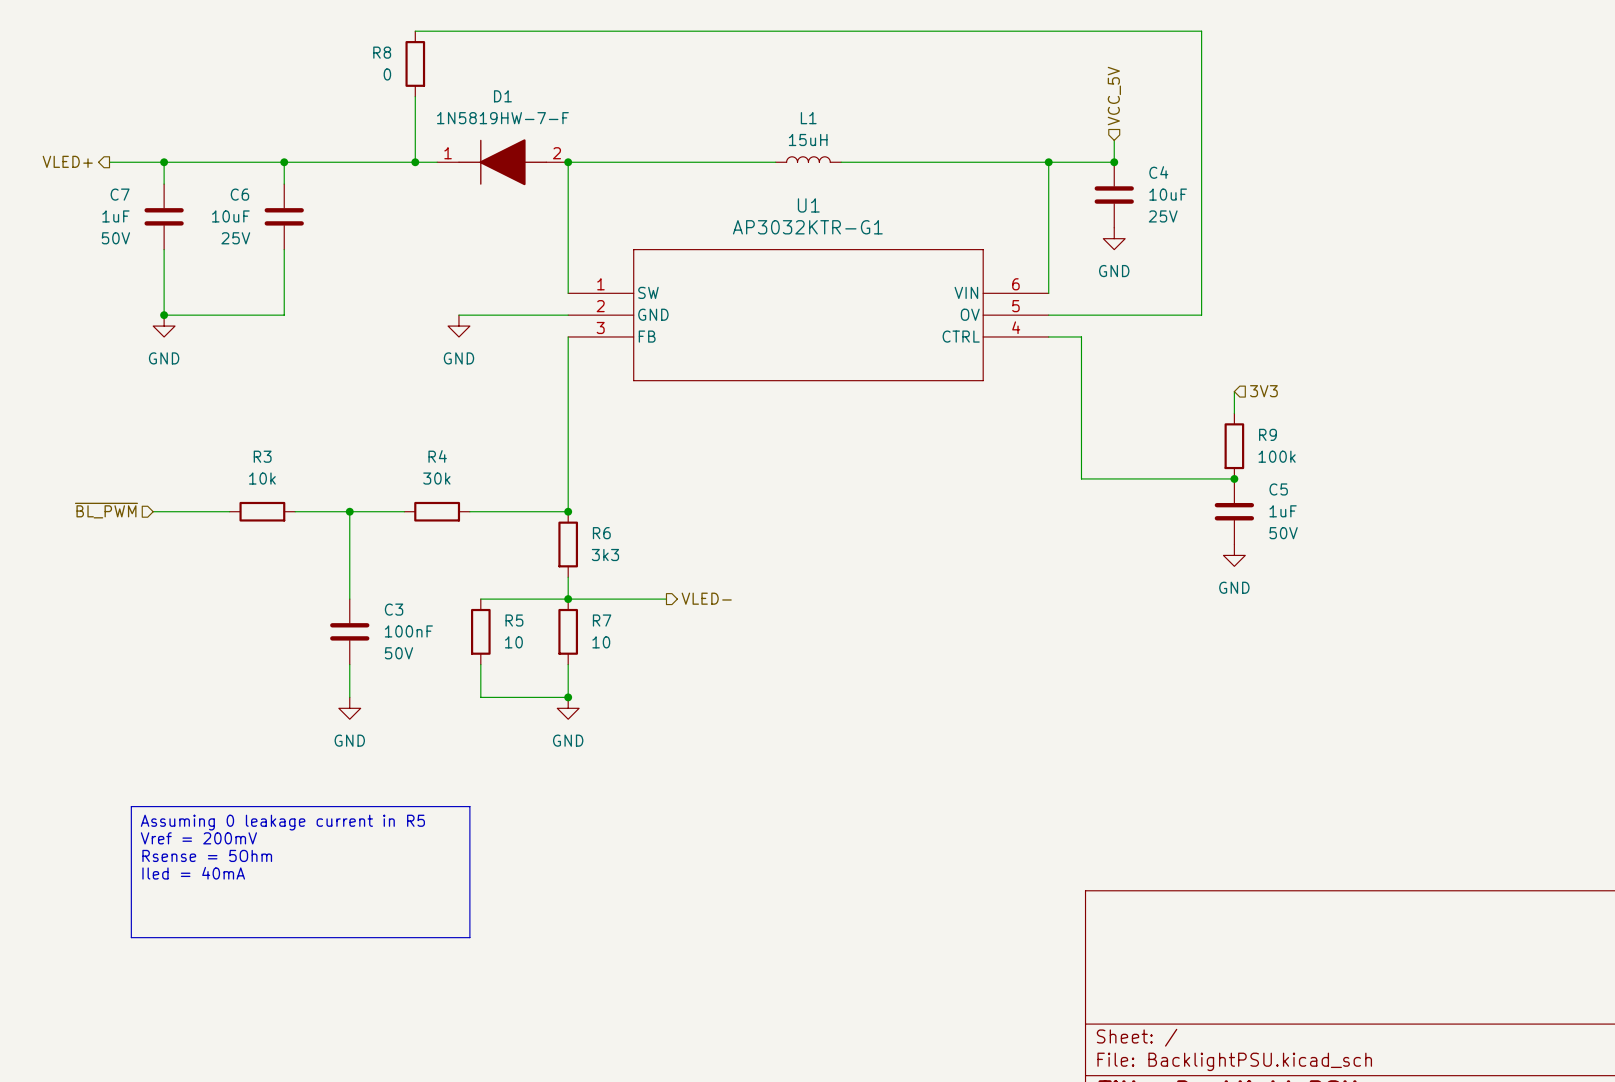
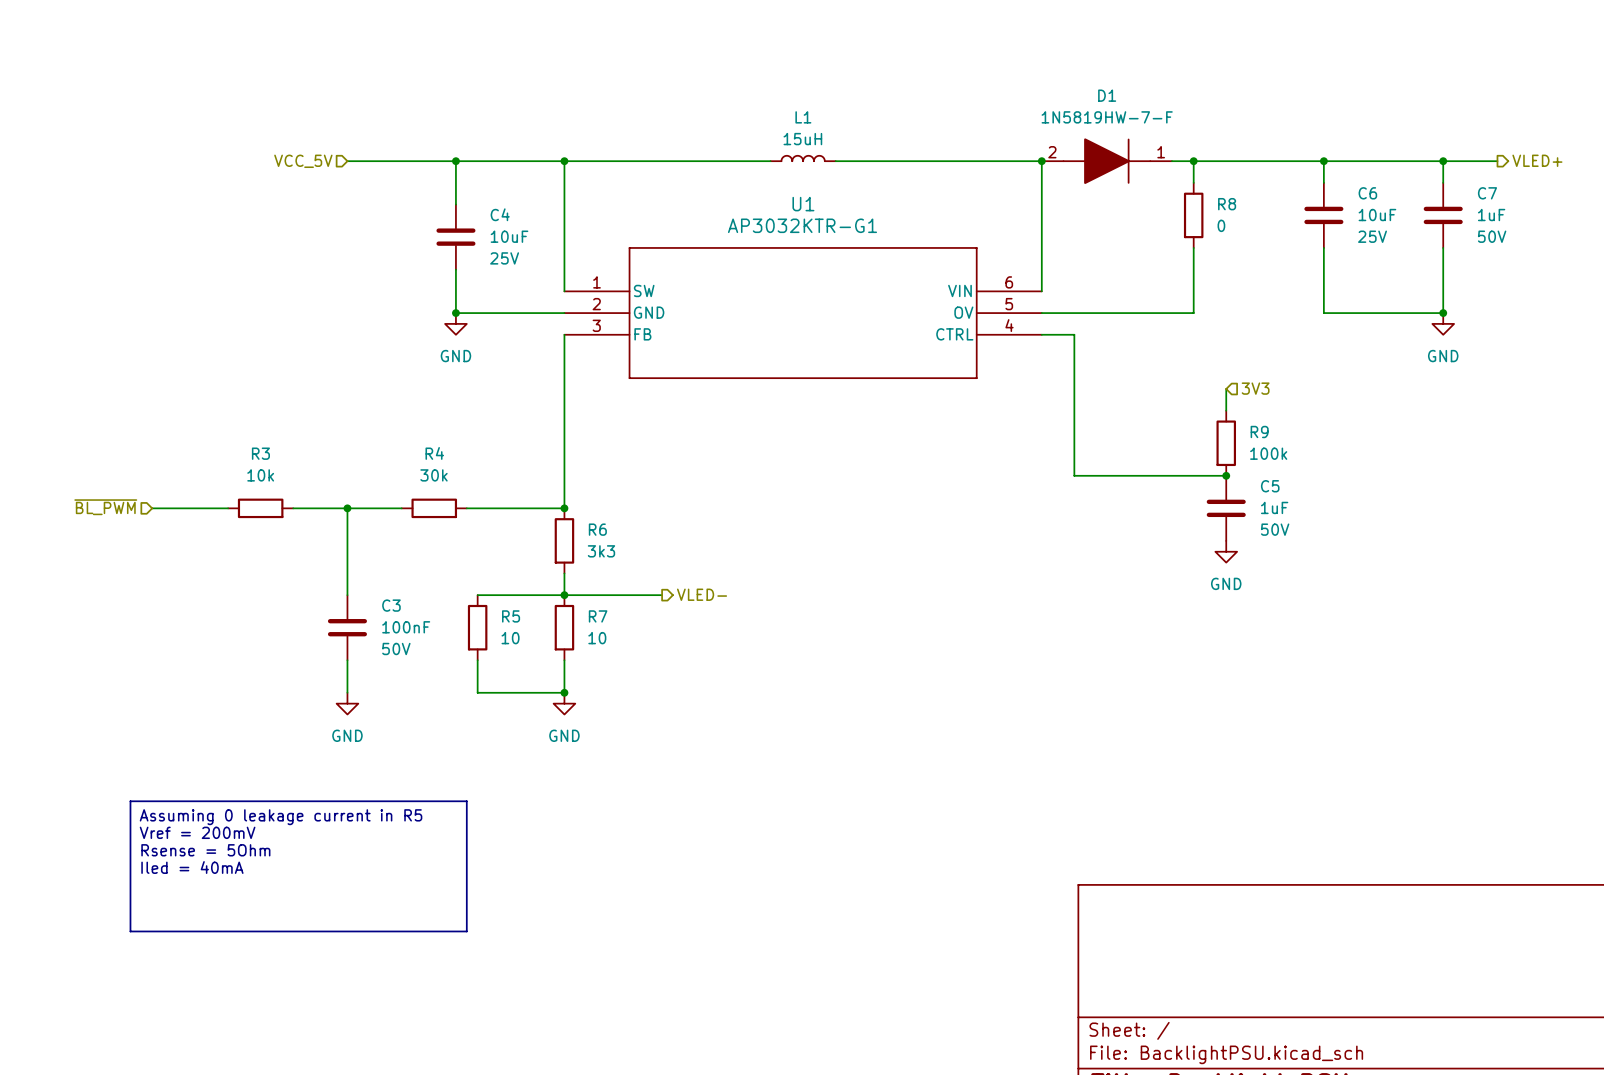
wire: (415, 31) (1201, 31) (1201, 162) -> none
R8 name position: R8 (382, 52) -> R8 (1227, 204)
R8 position: (415, 63) -> (1193, 215)
R8 value position: 0 (387, 74) -> 0 (1221, 225)
wire: (415, 96) (415, 162) -> none
hierarchical label: VCC_5V (1114, 96) -> none
hierarchical label: VLED+ (67, 161) -> none
hierarchical label: none -> VLED+ (1537, 160)
wire: (109, 162) (349, 162) -> none
wire: (164, 162) (164, 184) -> none
junction: (164, 162) -> none
wire: (284, 162) (284, 184) -> none
junction: (284, 162) -> none
hierarchical label: none -> VCC_5V (303, 161)
junction position: (415, 162) -> (455, 161)
wire: none -> (455, 161) (455, 204)
D1 rotation: 0° (502, 162) -> 180° (1106, 161)
D1 position: (502, 162) -> (1106, 161)
junction: (1114, 162) -> none
wire: none -> (1171, 161) (1497, 161)
junction: none -> (1193, 161)
wire: none -> (1323, 161) (1323, 182)
junction: none -> (1323, 161)
wire: none -> (1443, 161) (1443, 182)
junction: none -> (1443, 161)
wire: (1201, 184) (1201, 249) -> none
C7 name position: C7 (120, 194) -> C7 (1487, 193)
C6 name position: C6 (239, 194) -> C6 (1367, 193)
C4 position: (1114, 195) -> (455, 237)
C7 value position: 1uF (115, 216) -> 1uF (1491, 215)
C7 position: (164, 216) -> (1443, 215)
C6 value position: 10uF (230, 216) -> 10uF (1377, 215)
C6 position: (284, 216) -> (1323, 215)
C7 text position: 50V (115, 238) -> 50V (1492, 236)
C6 text position: 25V (235, 238) -> 25V (1372, 236)
power symbol: GND (1114, 238) -> none
wire: (164, 249) (164, 315) (284, 315) (284, 249) -> none
wire: none -> (1323, 247) (1323, 313) (1443, 313) (1443, 247)
wire: none -> (455, 269) (455, 313)
junction: (164, 315) -> none
junction: none -> (455, 313)
junction: none -> (1443, 313)
power symbol: GND (164, 326) -> none
power symbol: none -> GND (1443, 323)

